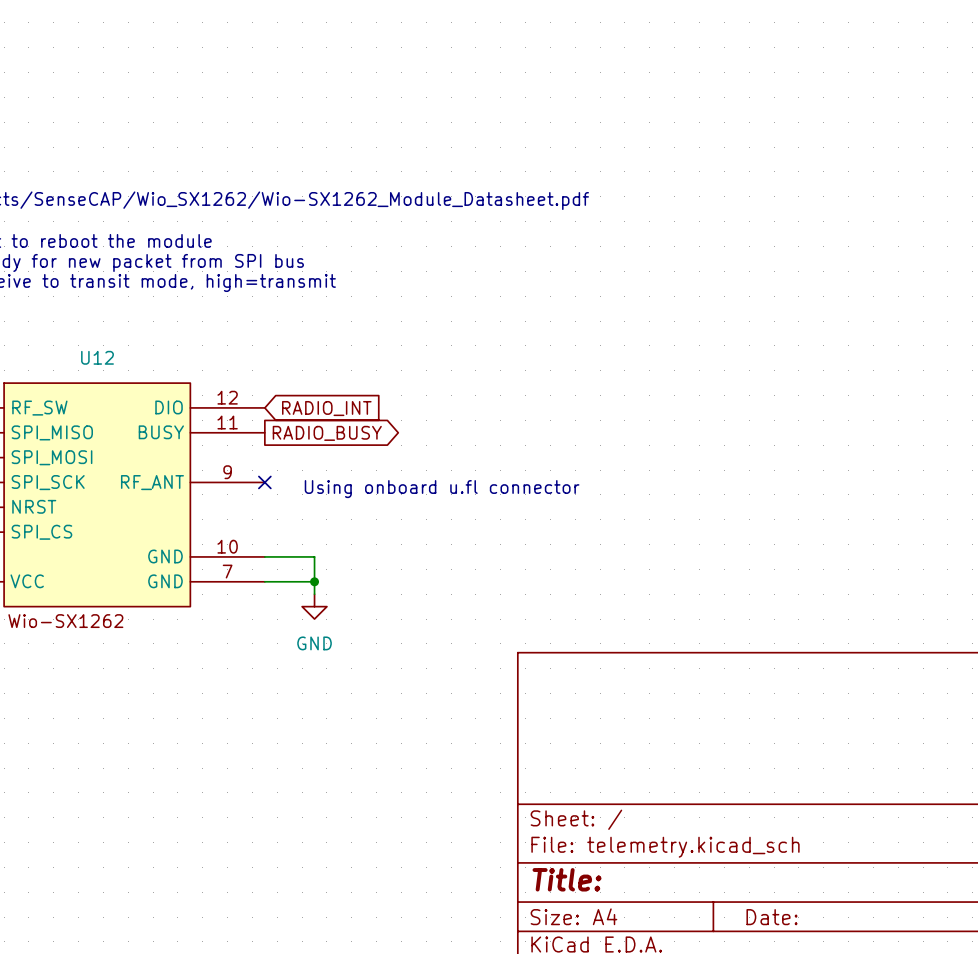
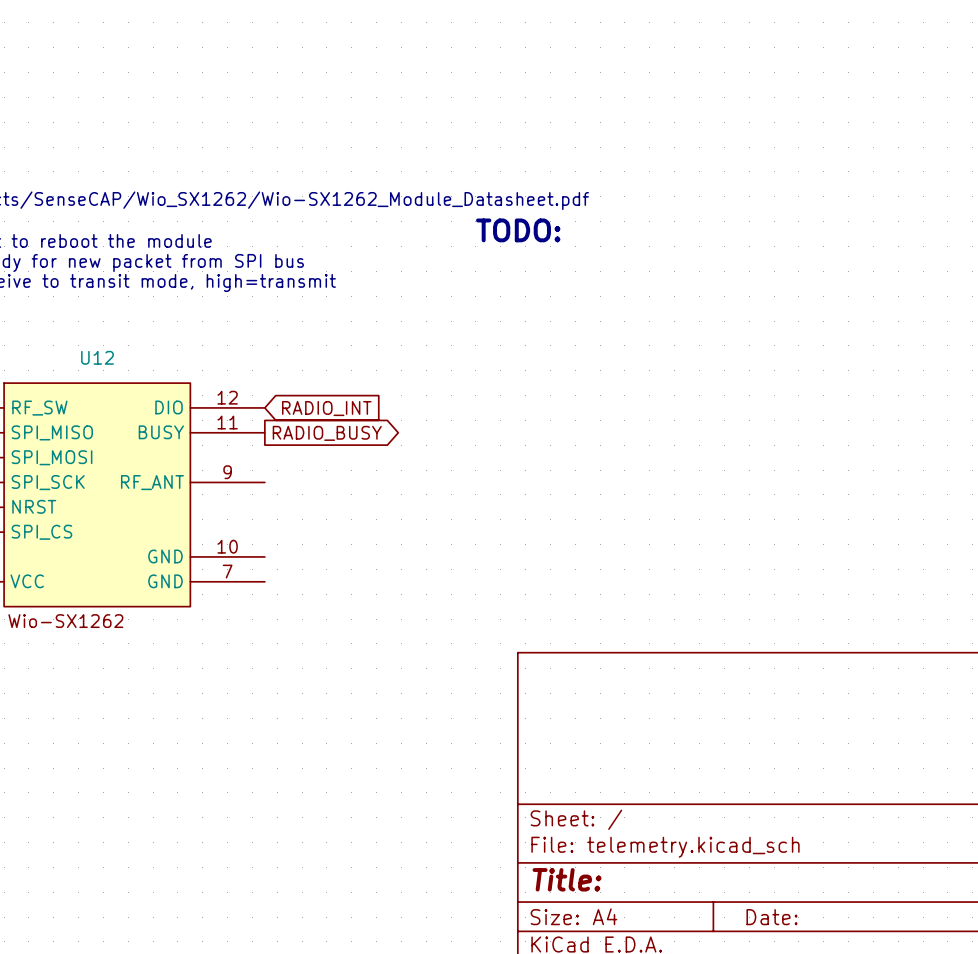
text: none -> TODO: (518, 230)
no-connect mark: (264, 482) -> none
text: Using onboard u.fl connector (442, 489) -> none
wire: (264, 556) (314, 556) (314, 594) -> none
wire: (264, 581) (314, 581) -> none
junction: (314, 581) -> none
power symbol: GND (314, 606) -> none

